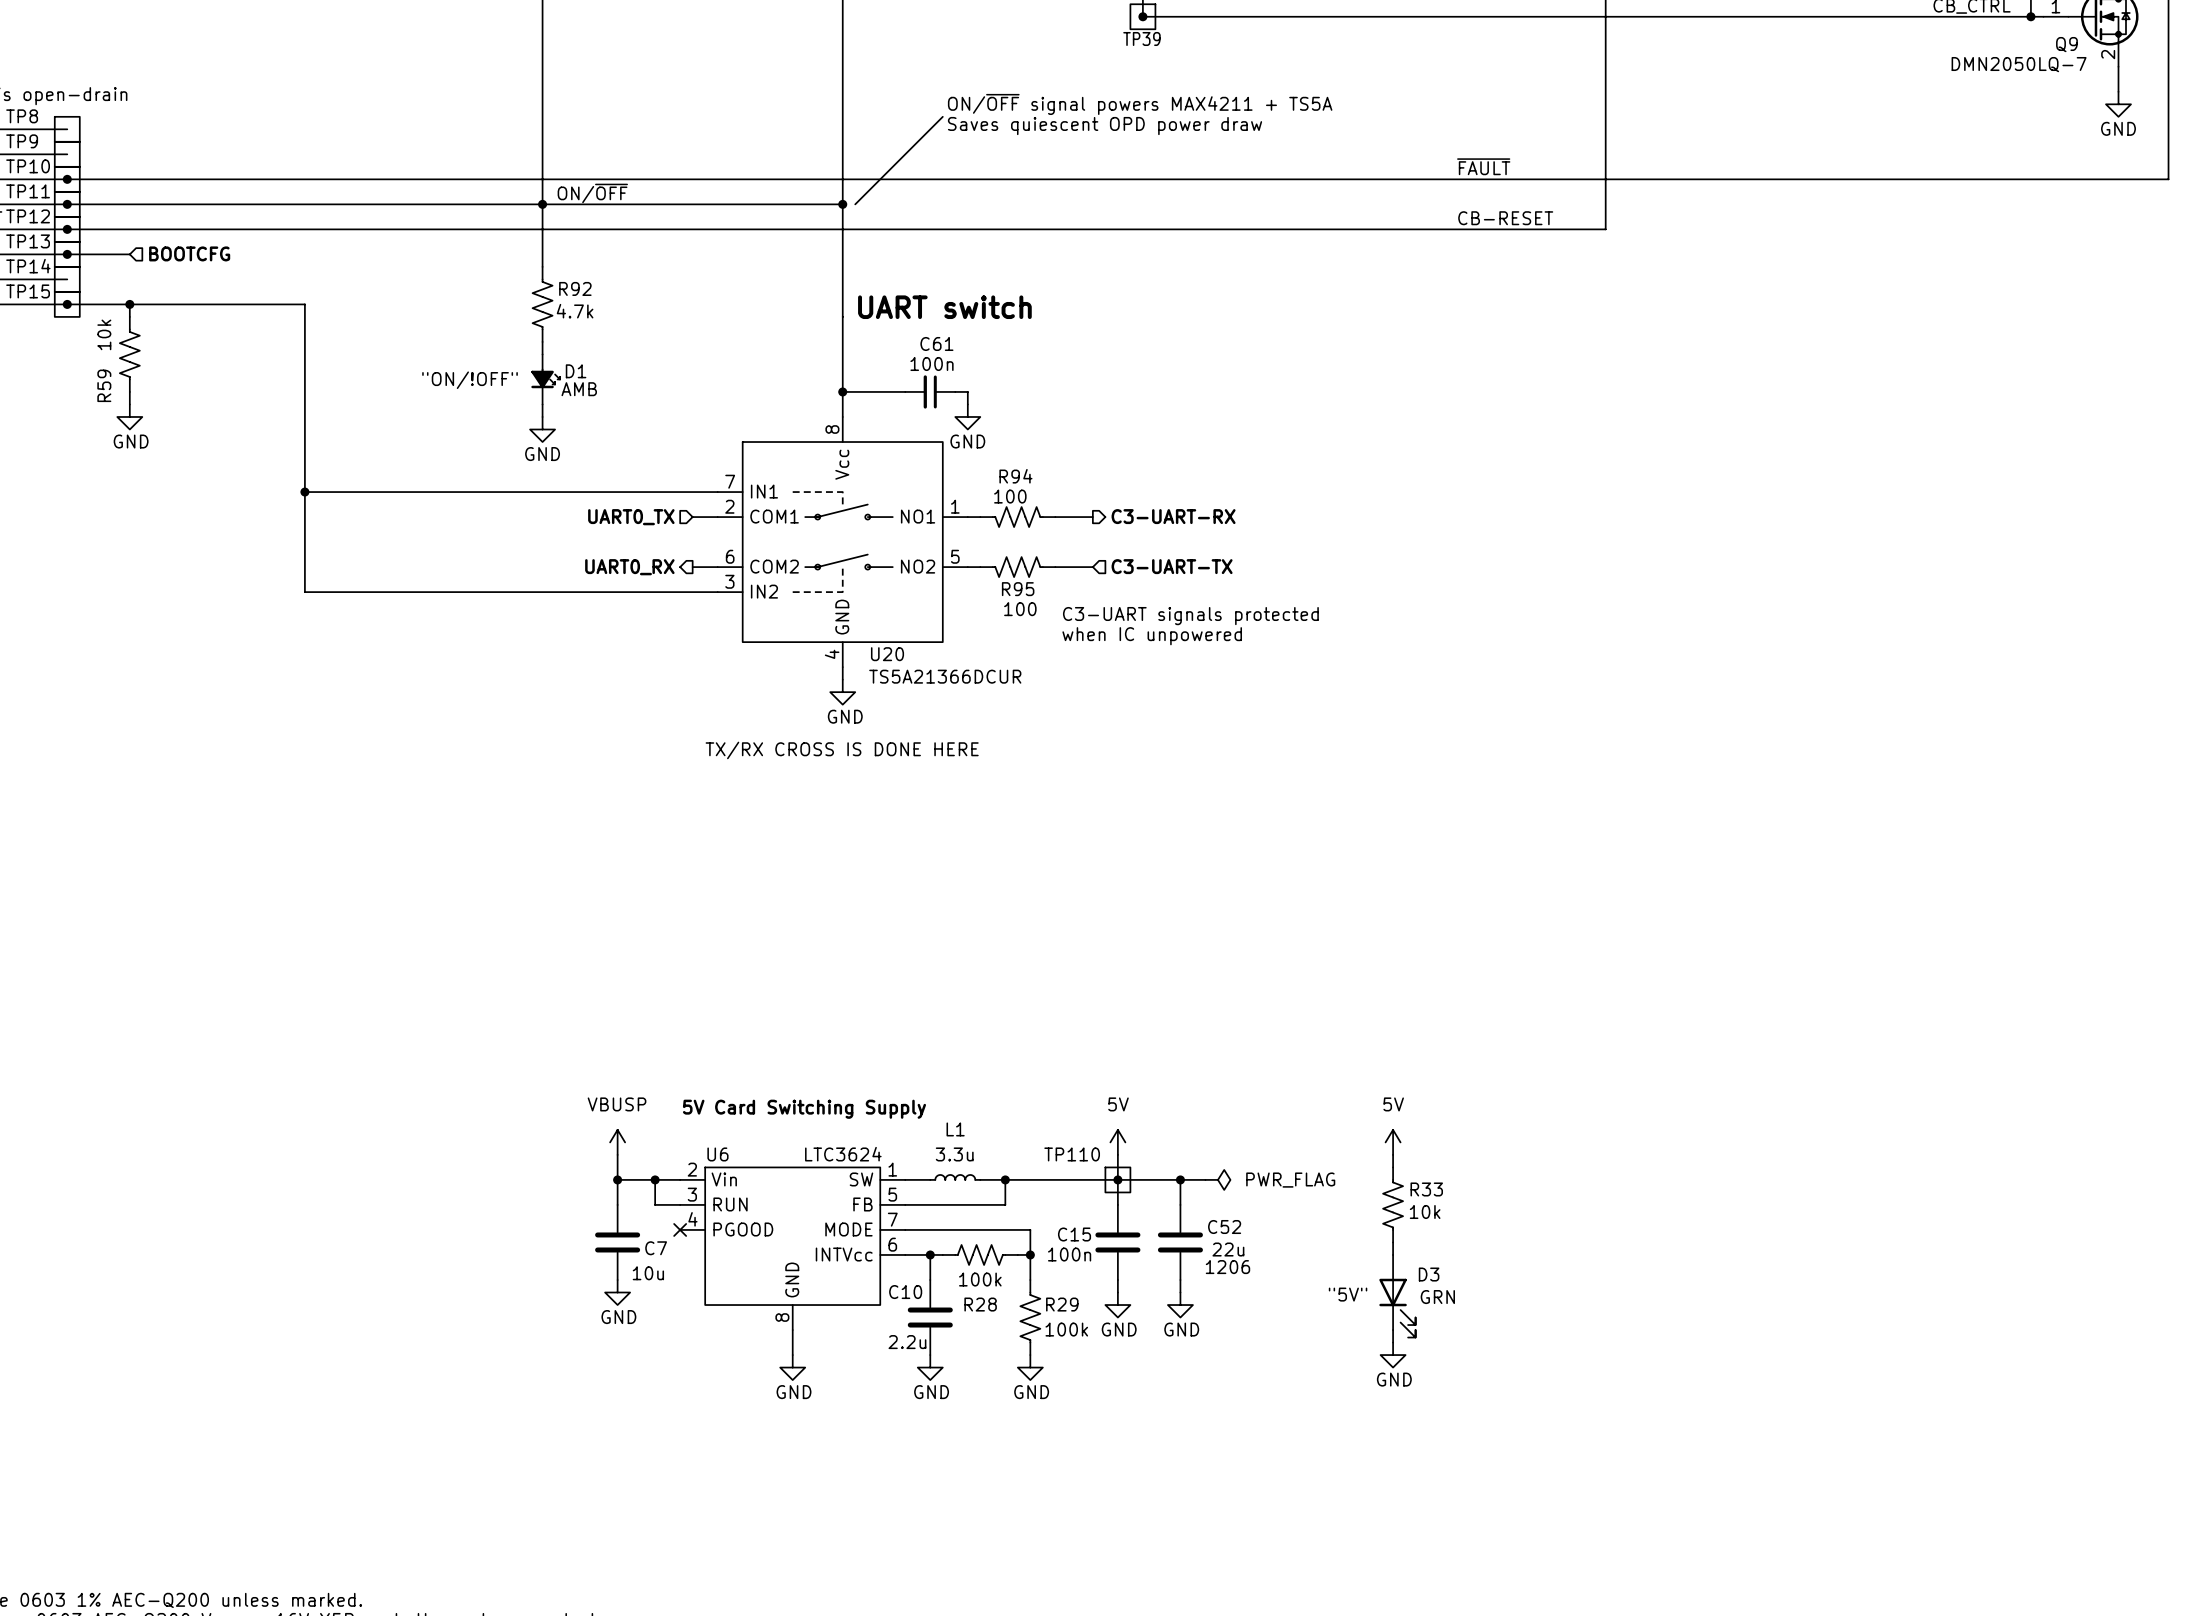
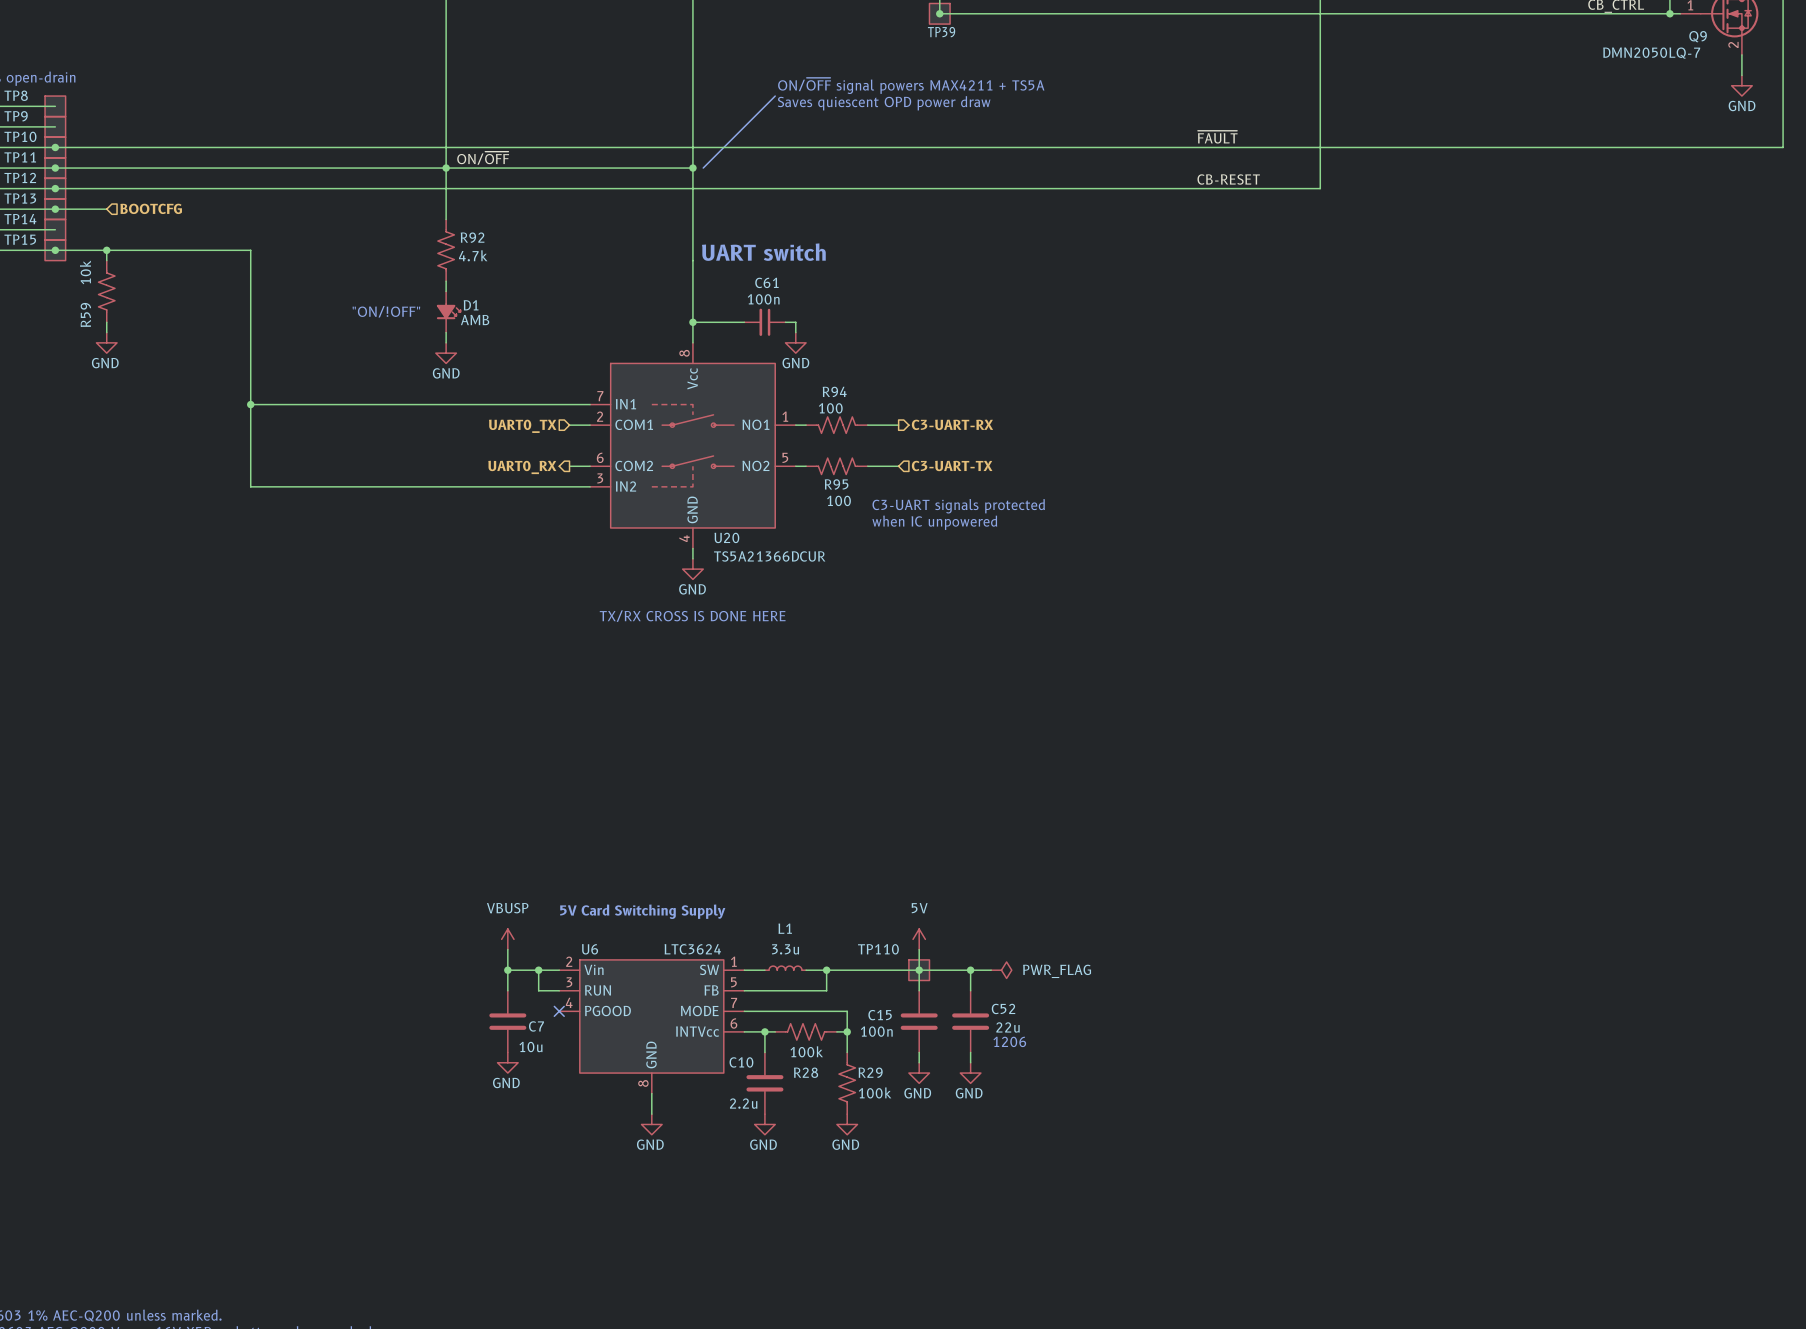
power symbol: 5V (1393, 1142) -> none
wire: (1393, 1154) (1393, 1167) -> none
R33: 10k (1393, 1204) -> none
wire: (1393, 1242) (1393, 1254) -> none
text: "5V" (1348, 1294) -> none
D3: GRN (1397, 1296) -> none
wire: (1393, 1330) (1393, 1342) -> none
power symbol: GND (1393, 1355) -> none

